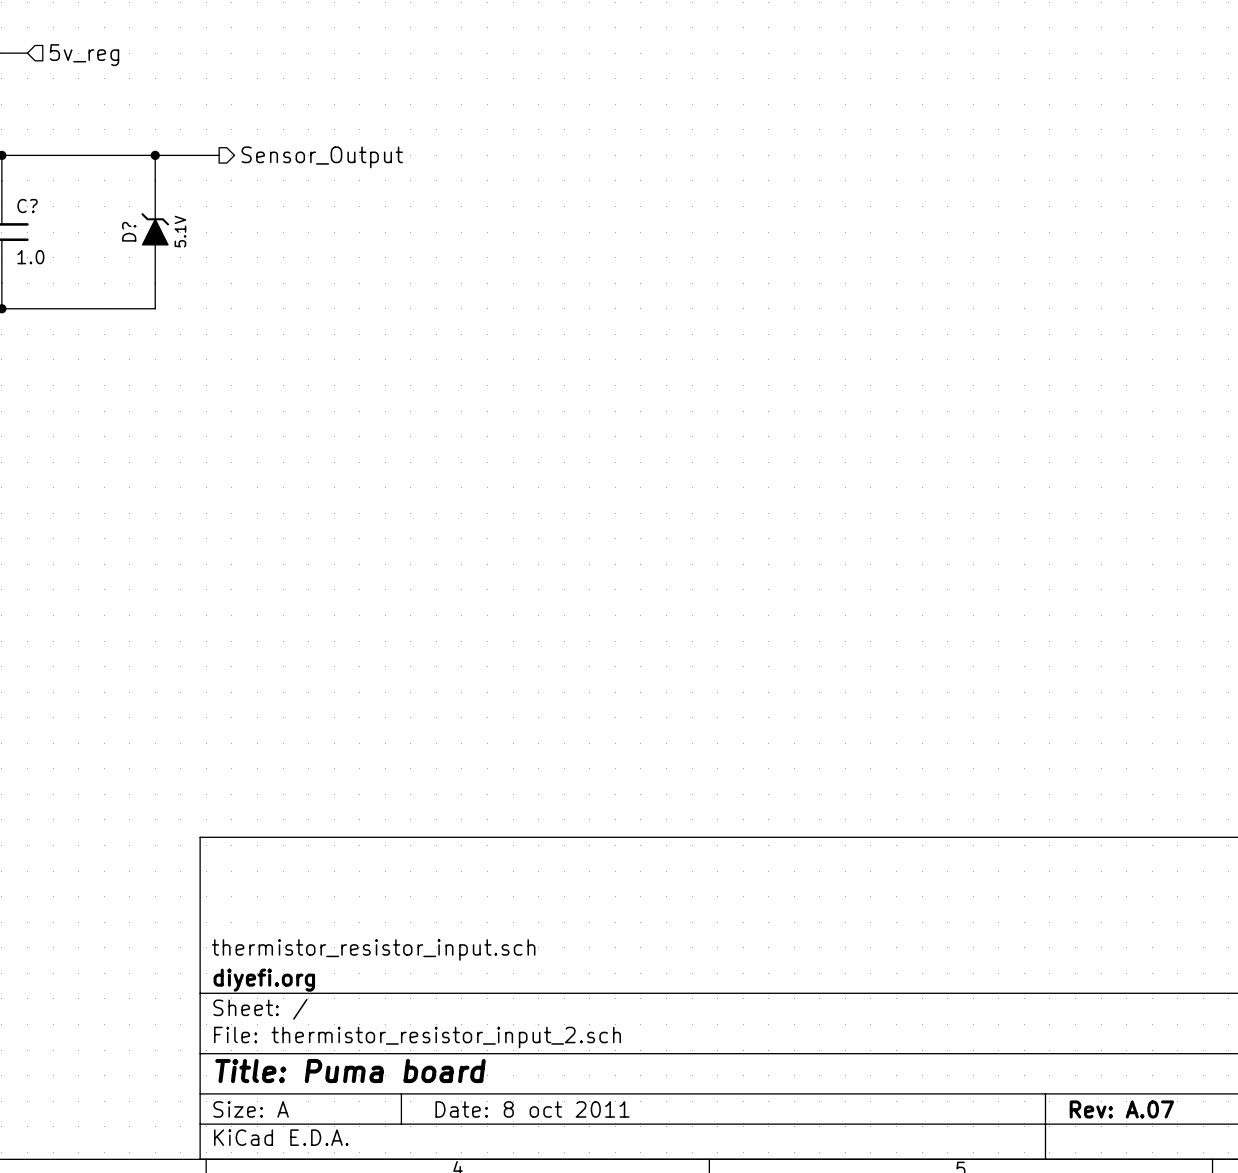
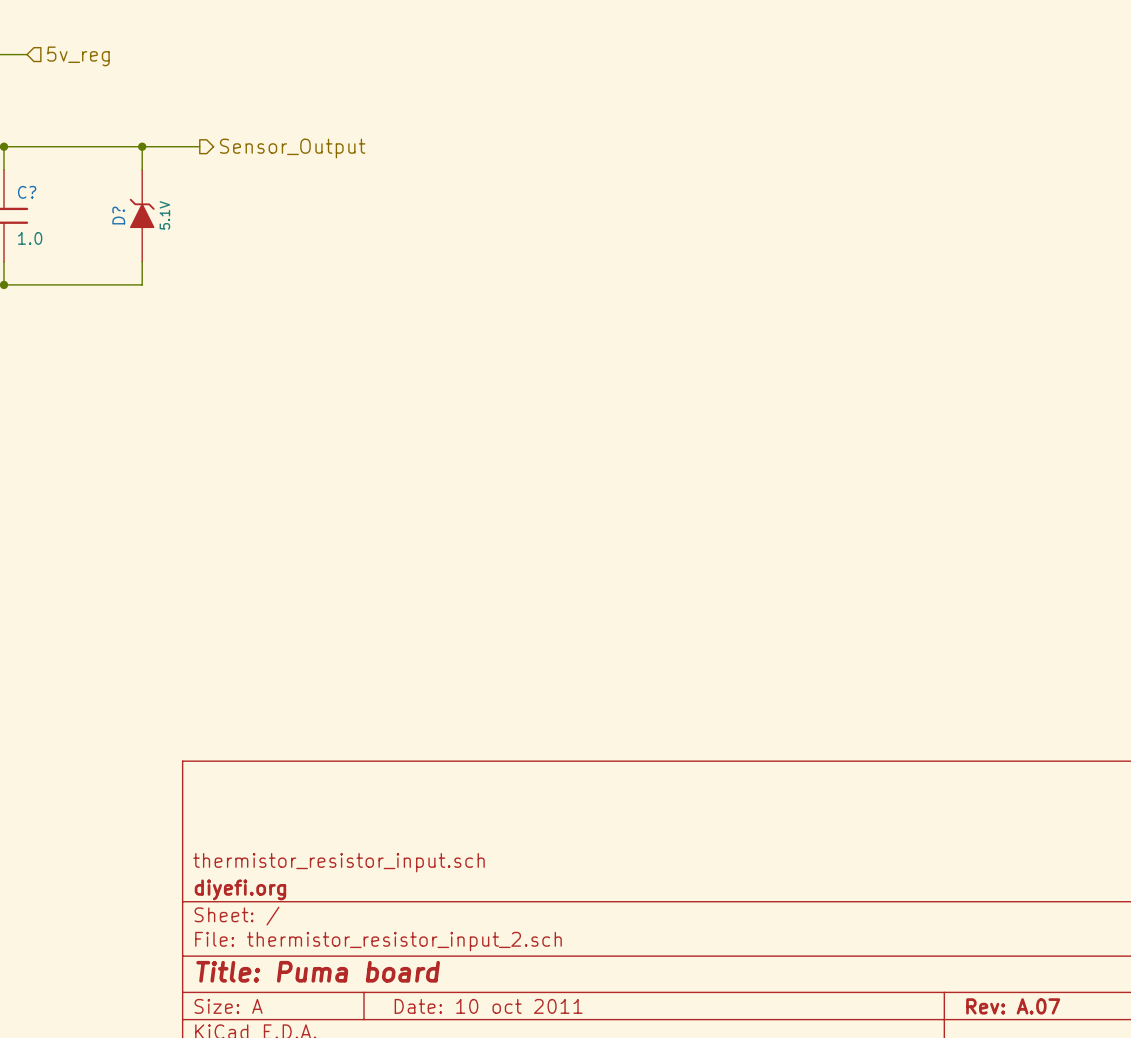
title block: Date: 8 oct 2011 (532, 1109) -> Date: 10 oct 2011 (488, 1006)

